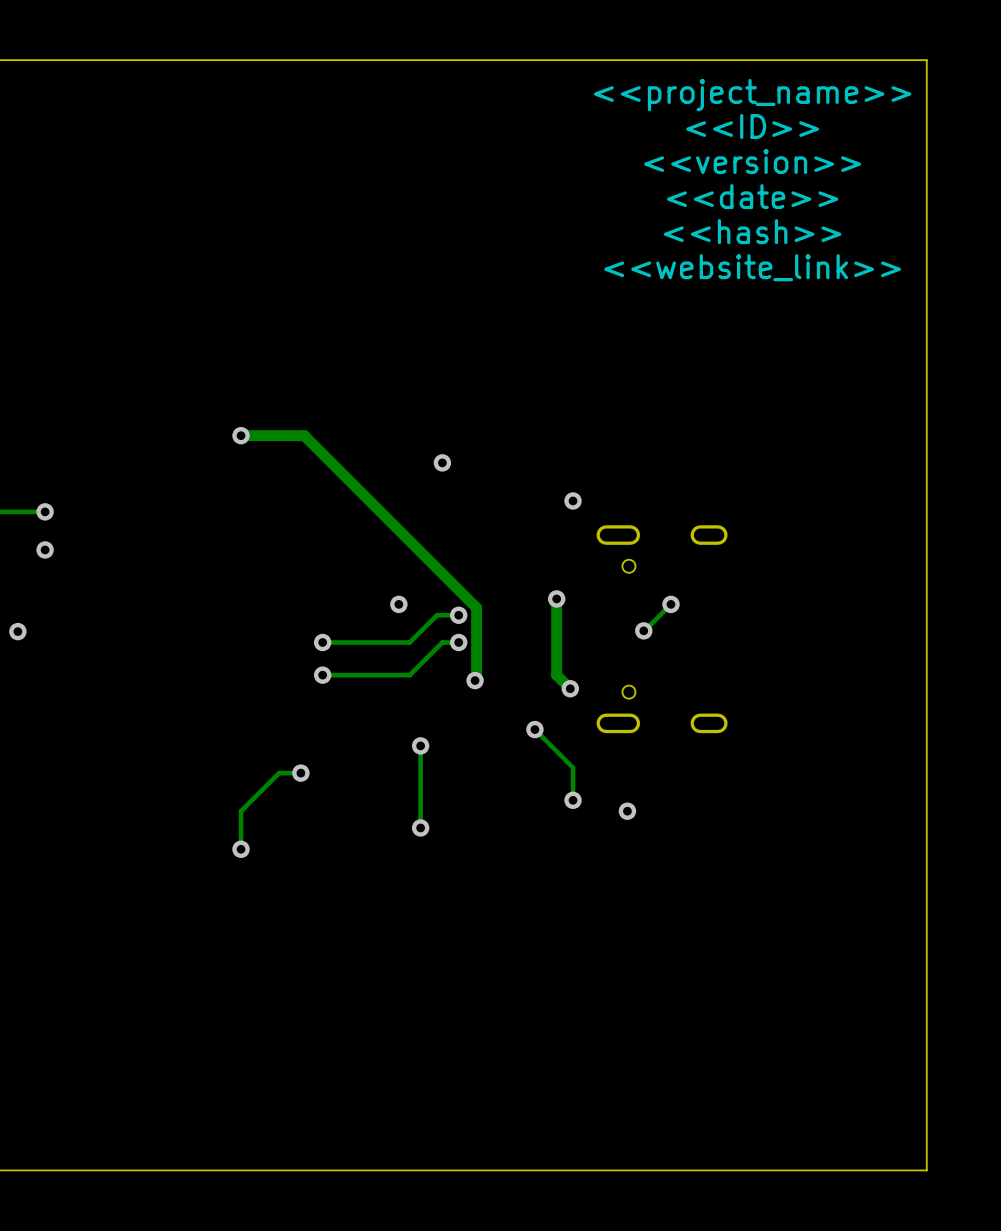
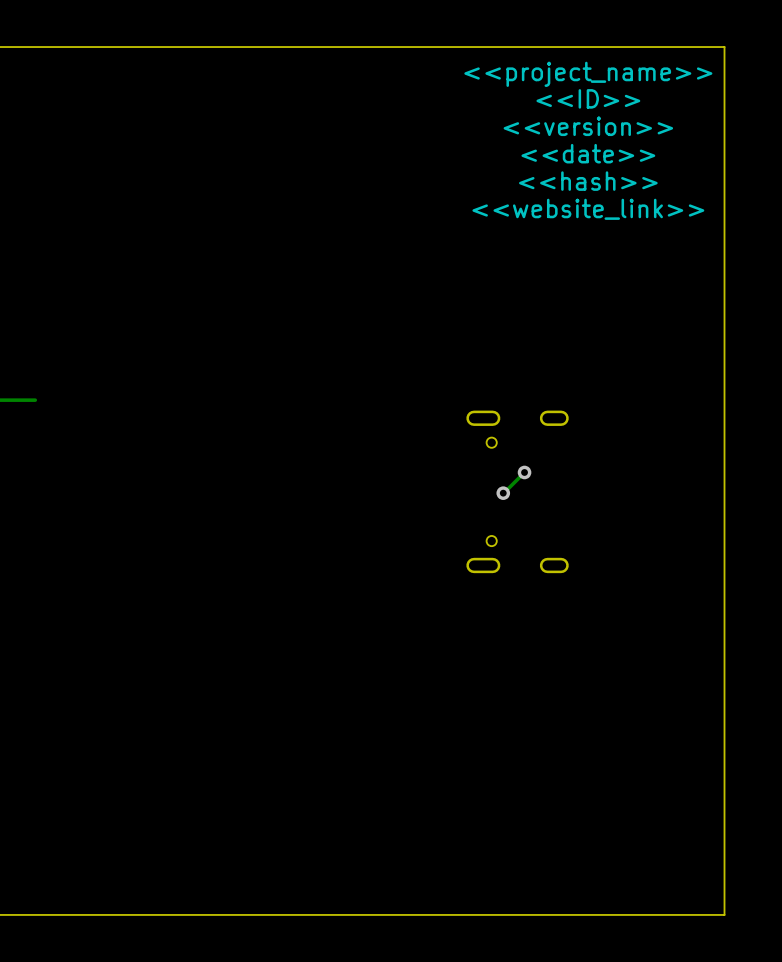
track: (241, 435) (304, 435) (476, 607) (475, 680) -> none
via: (241, 435) -> none
via: (442, 462) -> none
via: (573, 500) -> none
via: (45, 511) -> none
via: (45, 549) -> none
track: (556, 598) (556, 675) (570, 688) -> none
via: (556, 598) -> none
via: (398, 604) -> none
track: (458, 615) (436, 615) (409, 642) (322, 642) -> none
via: (458, 615) -> none
via: (17, 631) -> none
via: (322, 642) -> none
track: (458, 642) (442, 642) (409, 675) (322, 675) -> none
via: (458, 642) -> none
via: (322, 675) -> none
via: (475, 680) -> none
via: (570, 688) -> none
track: (534, 729) (573, 767) (573, 800) -> none
via: (534, 729) -> none
track: (420, 745) (420, 827) -> none
via: (420, 745) -> none
track: (300, 773) (279, 773) (241, 811) (241, 849) -> none
via: (300, 773) -> none
via: (573, 800) -> none
via: (627, 811) -> none
via: (420, 827) -> none
via: (241, 849) -> none

